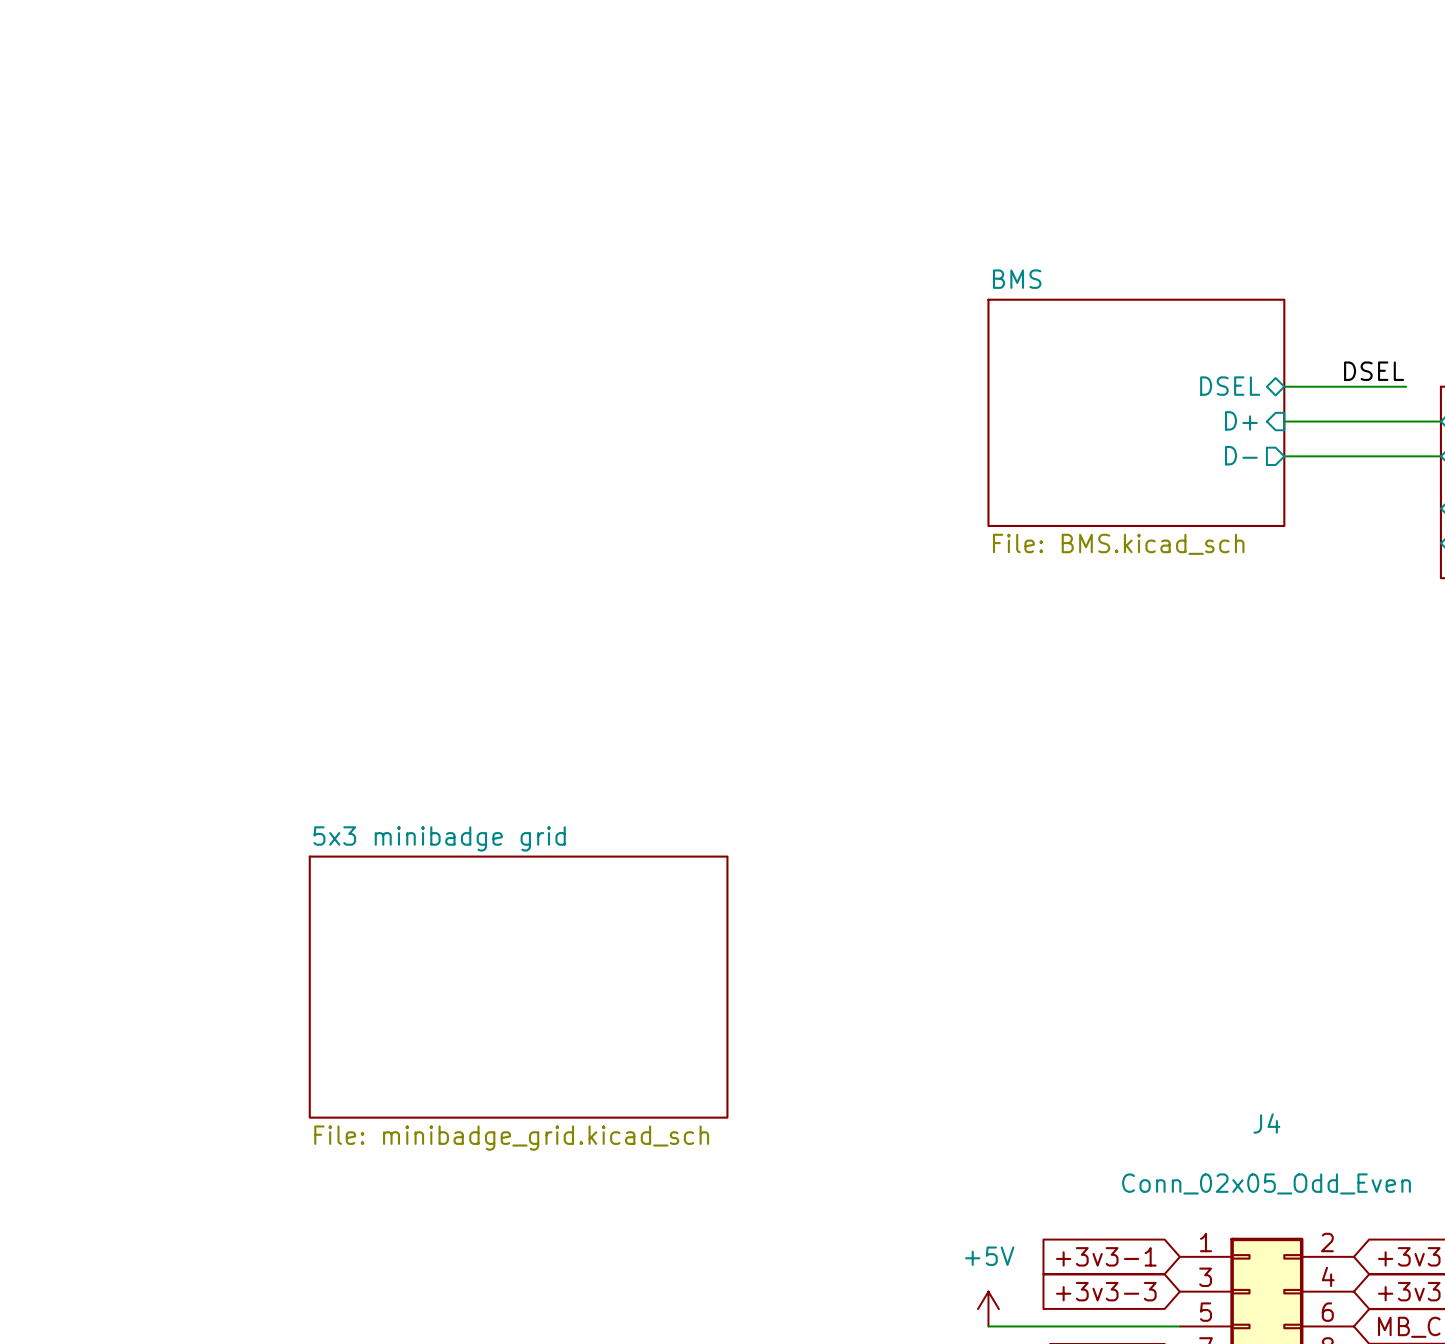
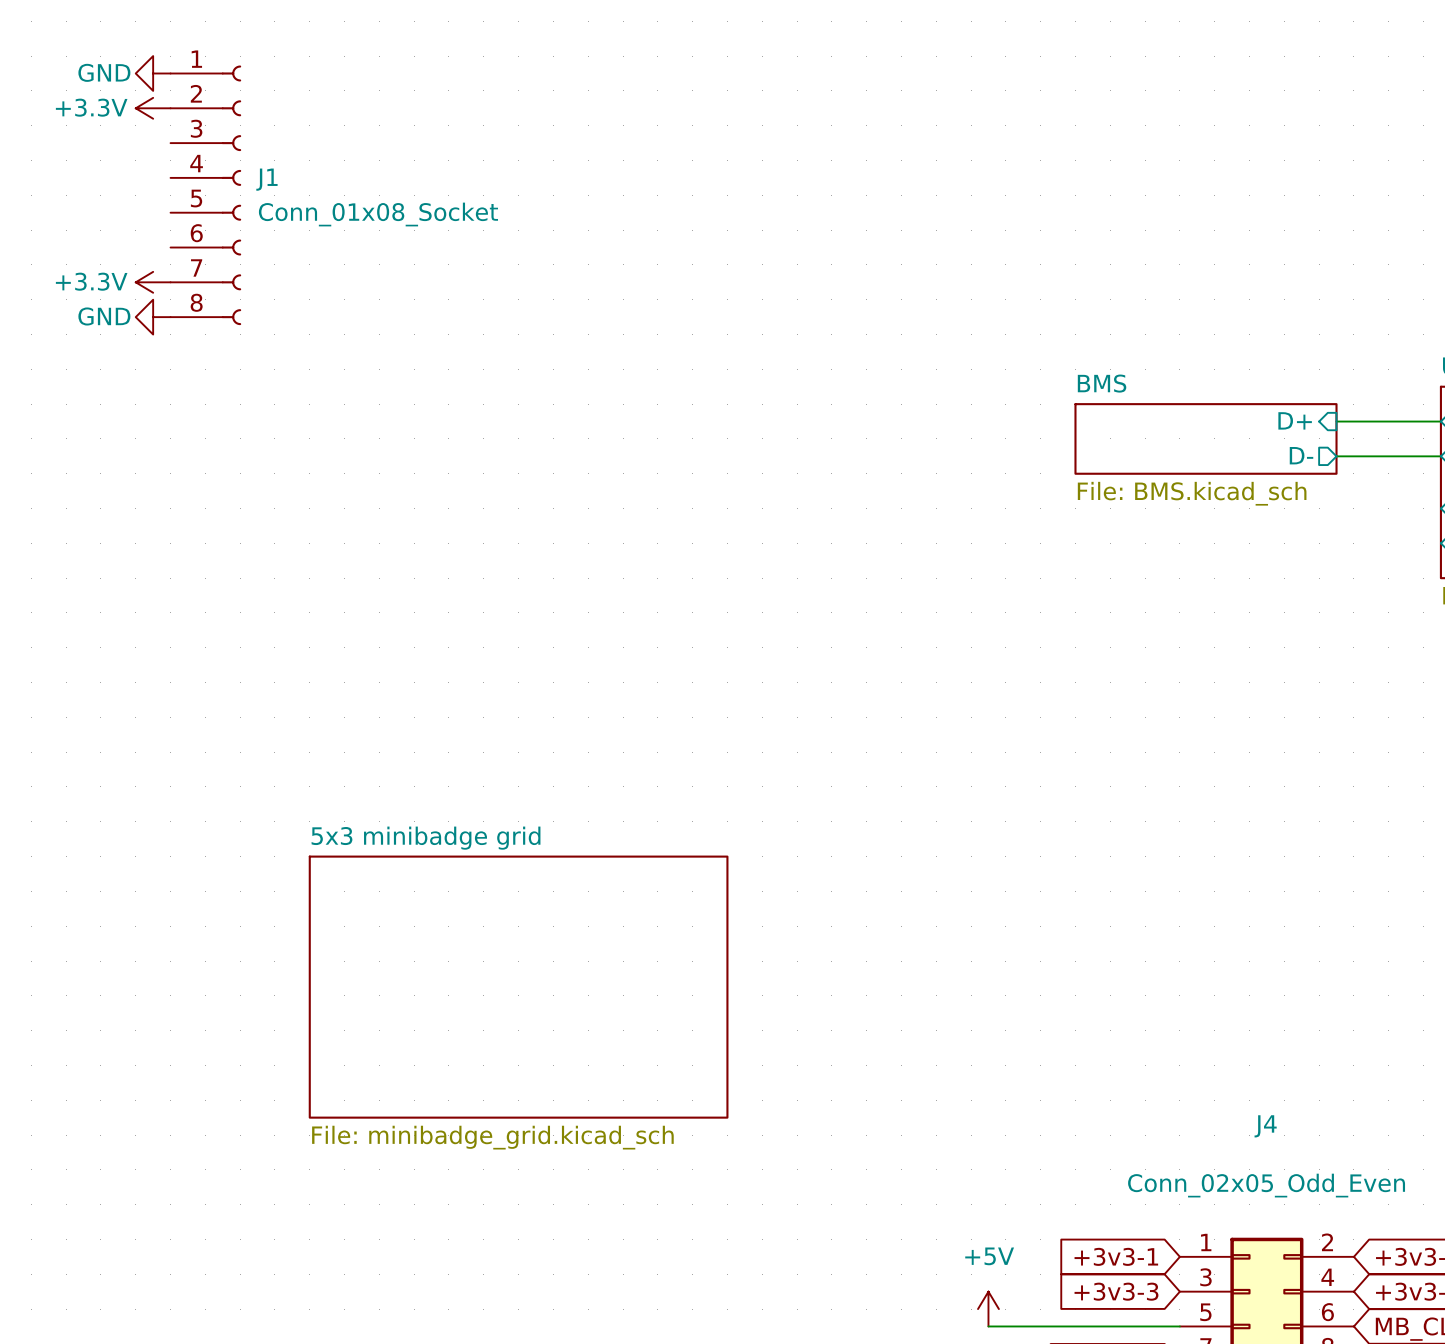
power symbol: none -> GND (153, 73)
power symbol: none -> +3.3V (153, 108)
J1: none -> Conn_01x08_Socket (205, 195)
power symbol: none -> +3.3V (153, 282)
power symbol: none -> GND (153, 317)
label: DSEL (1374, 371) -> none
sheet pin: DSEL (1230, 386) -> none
wire: (1284, 386) (1406, 386) -> none
sheet BMS: File: BMS.kicad_sch (1136, 412) -> none
sheet pin position: D+ (1241, 420) -> D+ (1295, 420)
wire: (1284, 421) (1336, 421) -> none
sheet BMS: none -> File: BMS.kicad_sch (1206, 438)
sheet pin position: D- (1241, 455) -> D- (1301, 455)
wire: (1284, 456) (1336, 456) -> none

